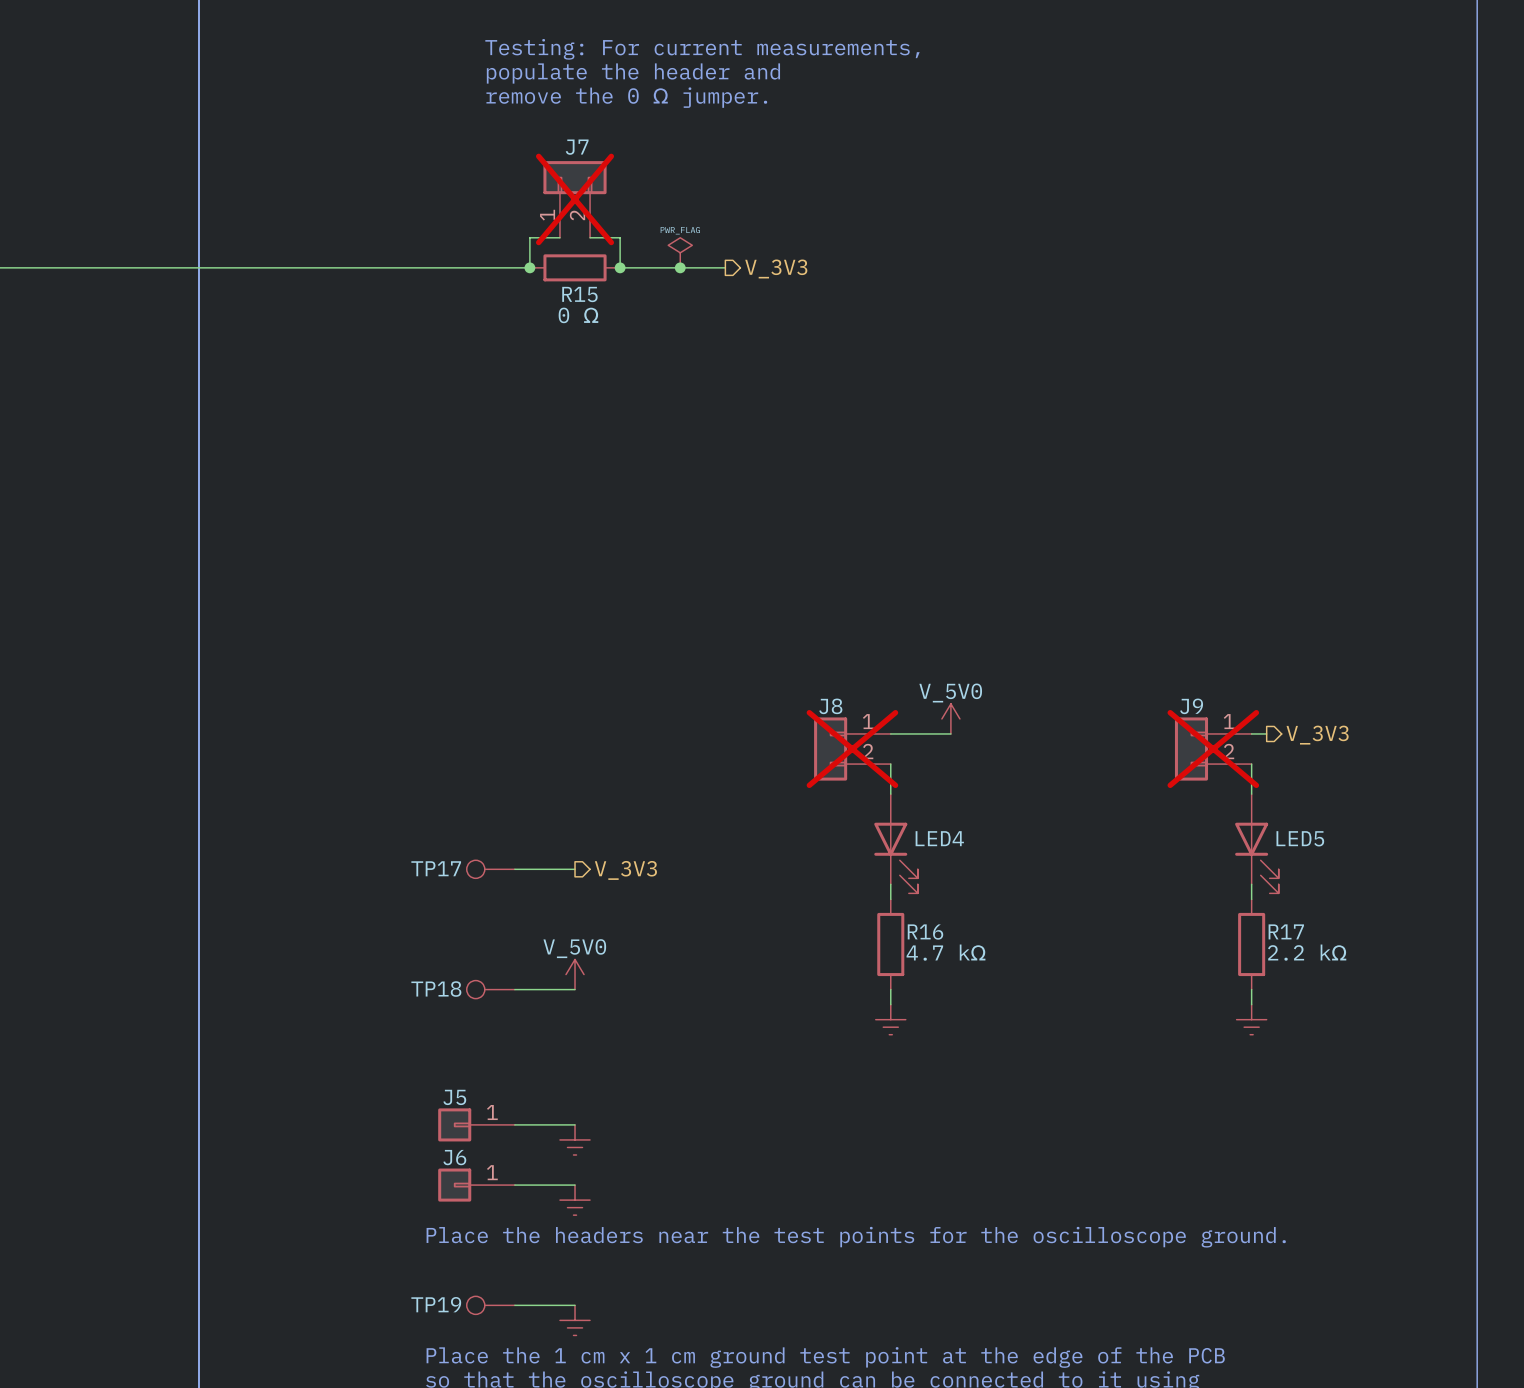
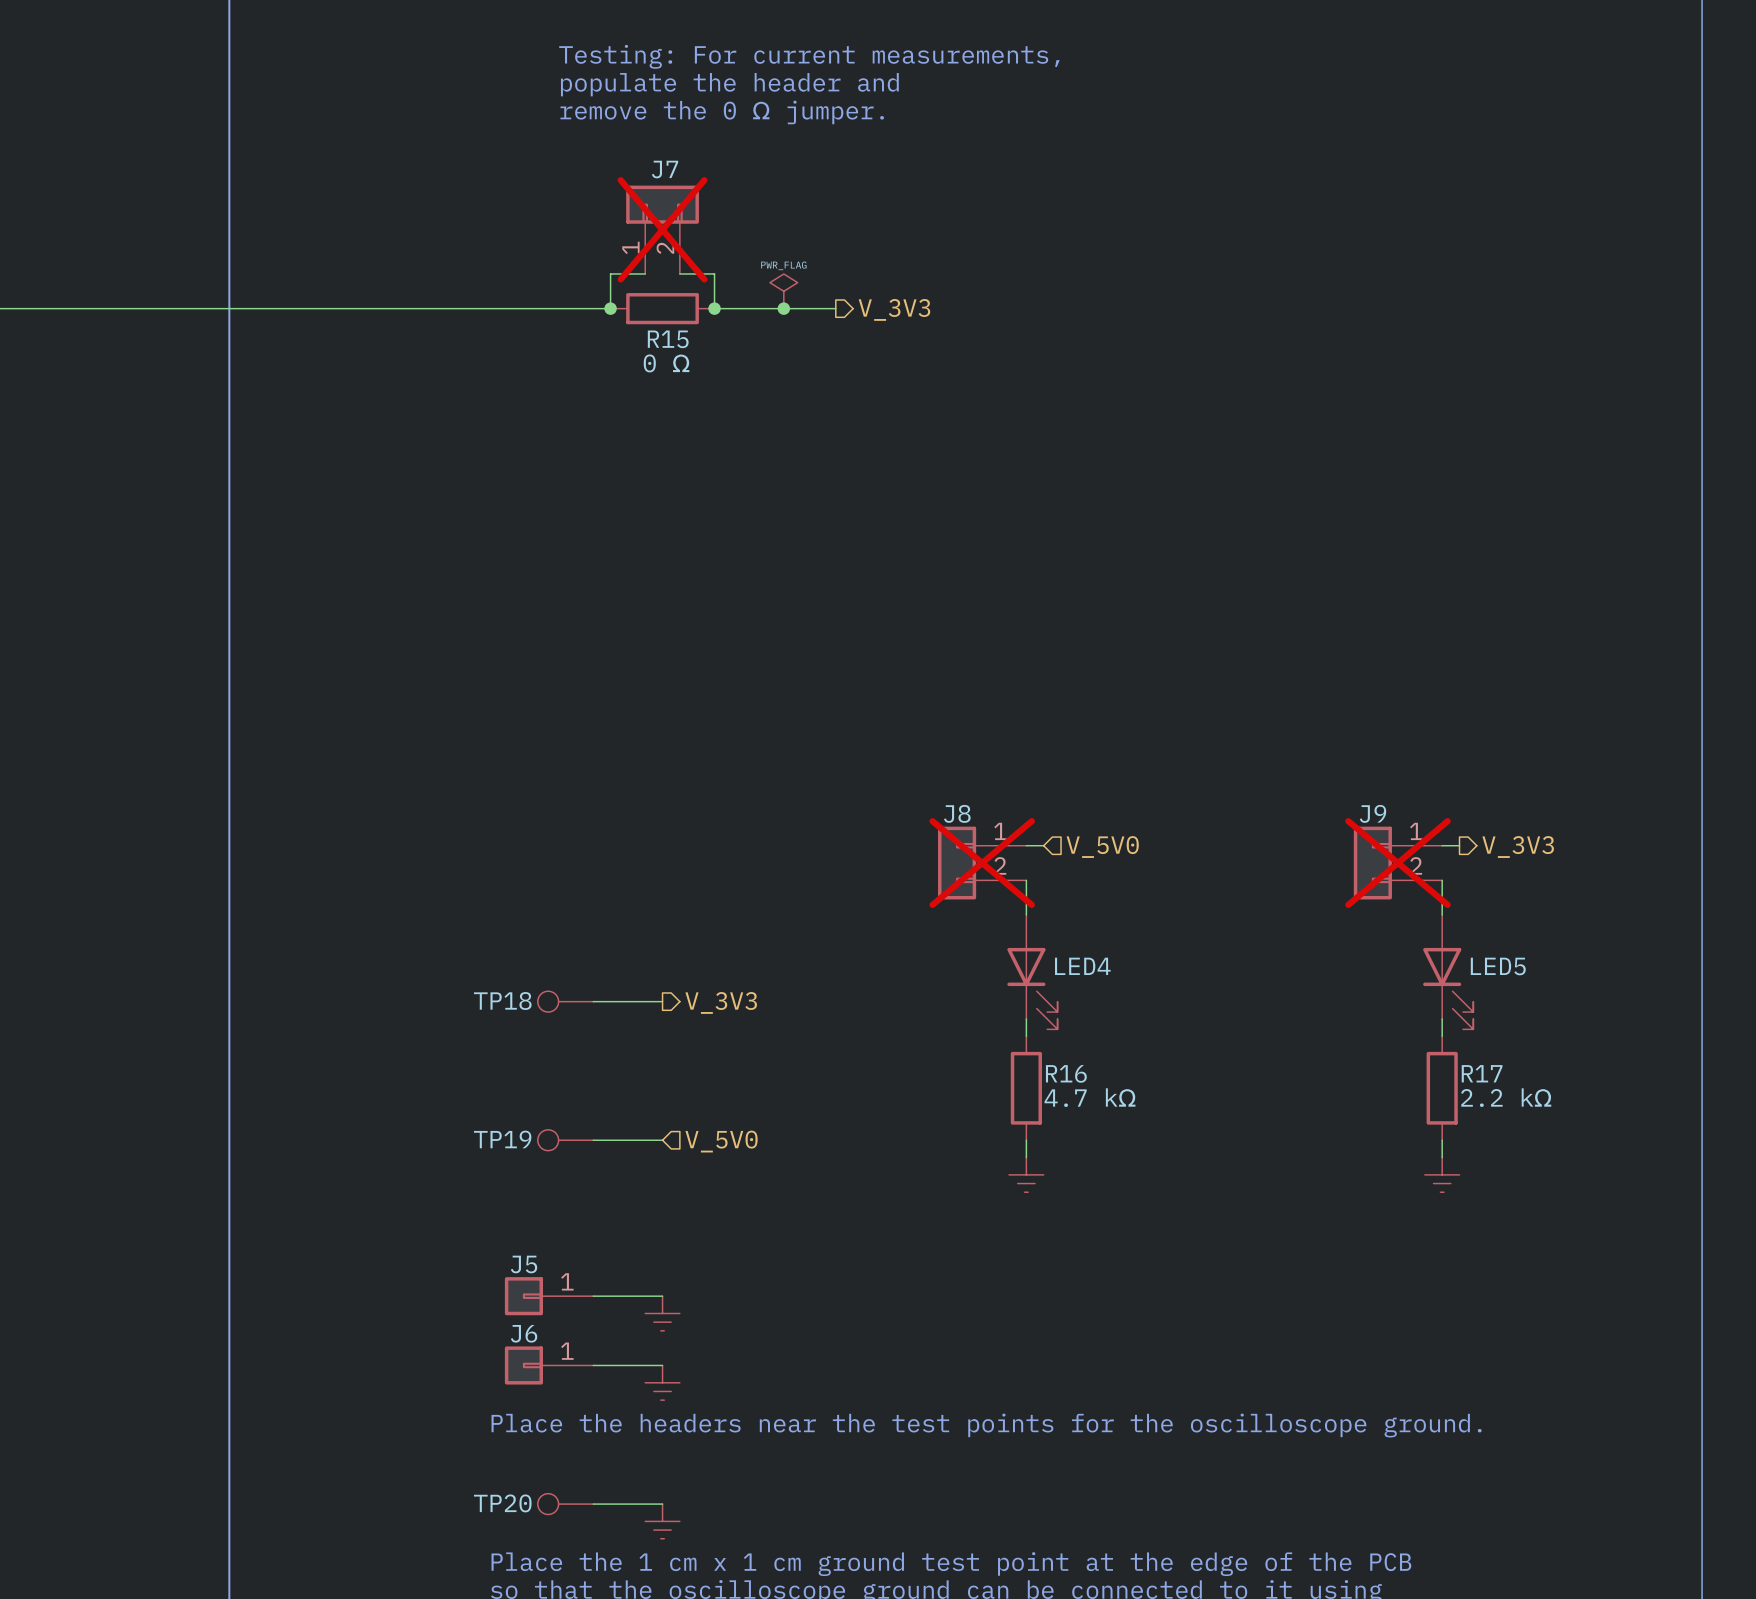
power symbol: V_5V0 (950, 718) -> none
wire: (905, 733) (950, 733) -> none
hierarchical label: none -> V_5V0 (1102, 847)
TP17 name: TP17 (436, 868) -> TP18 (502, 1001)
power symbol: V_5V0 (575, 974) -> none
TP18 name: TP18 (436, 989) -> TP19 (502, 1139)
hierarchical label: none -> V_5V0 (721, 1141)
TP19 name: TP19 (436, 1304) -> TP20 (502, 1503)

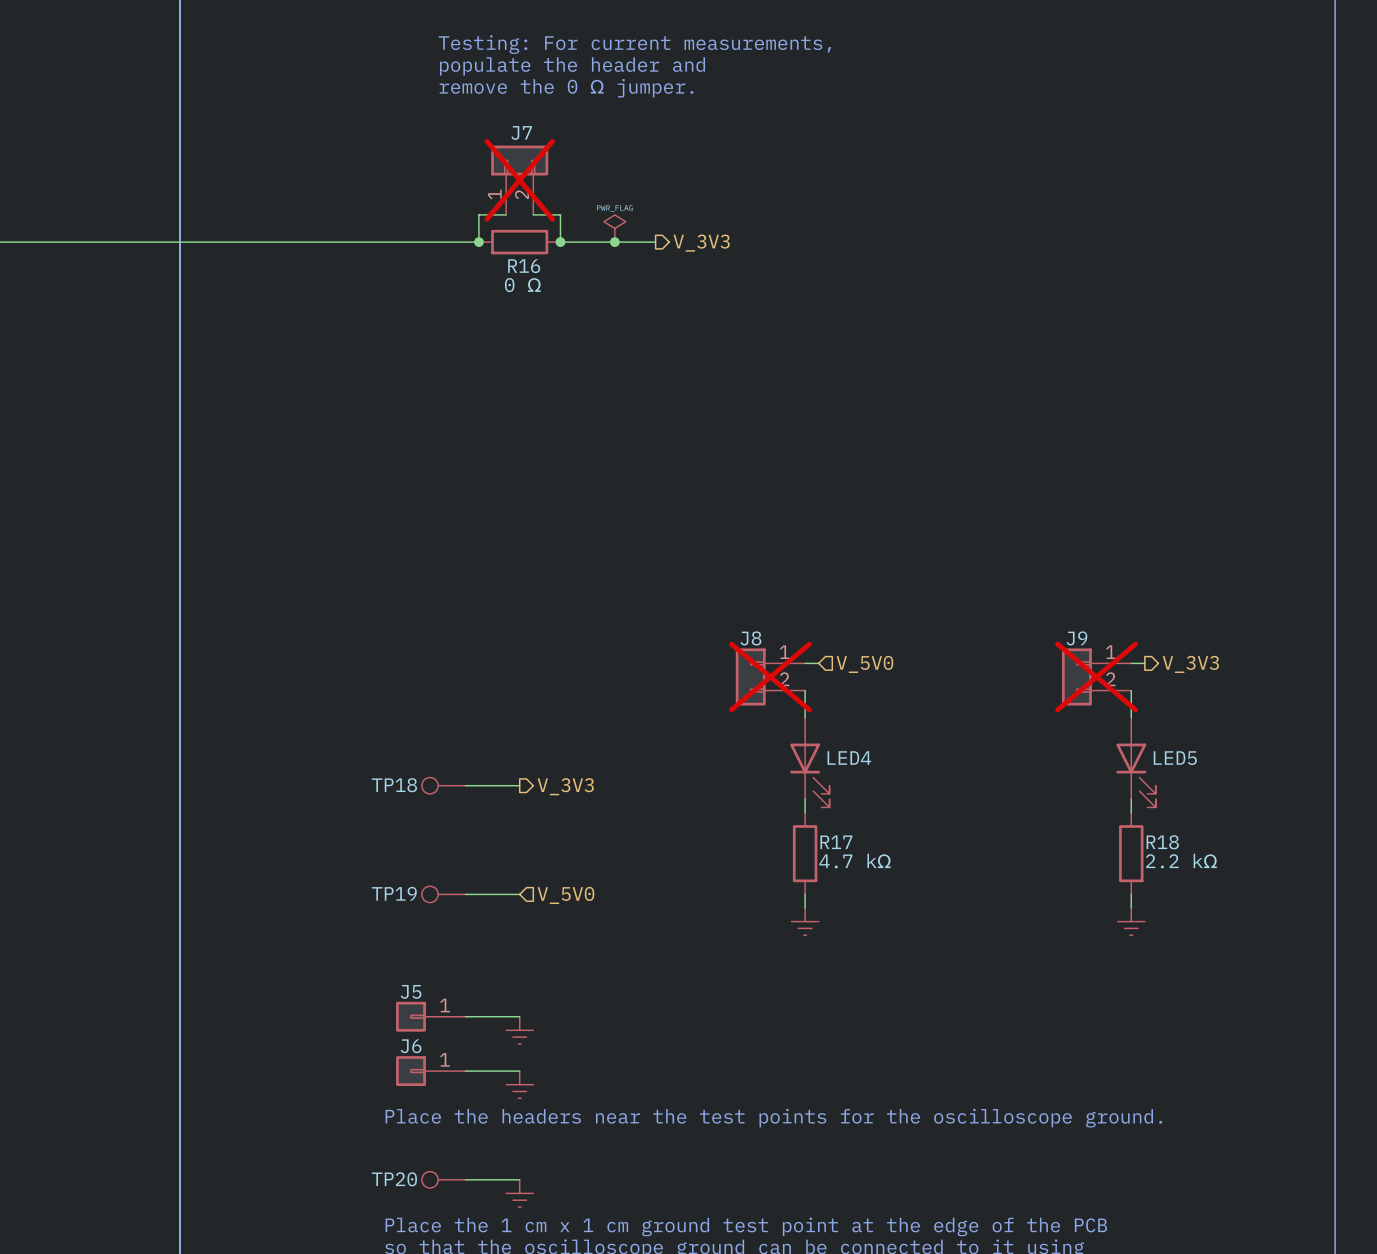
R15 name: R15 (668, 339) -> R16 (524, 266)
R16 name: R16 (1066, 1073) -> R17 (836, 842)
R17 name: R17 (1482, 1073) -> R18 (1162, 842)

